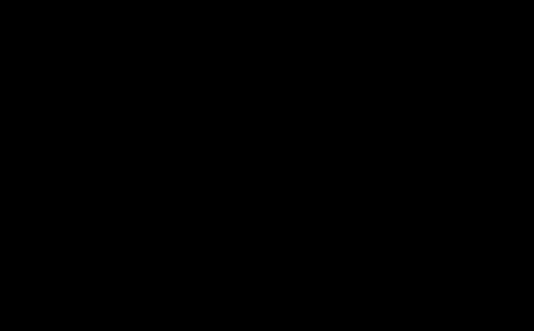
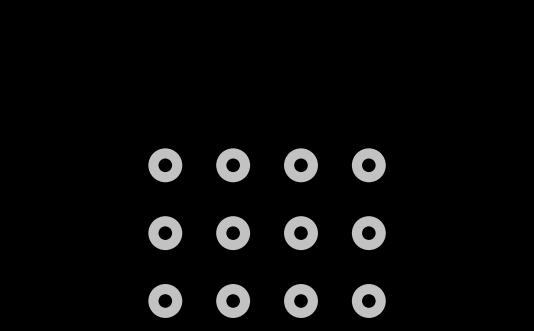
via: none -> (165, 165)
via: none -> (233, 165)
via: none -> (300, 165)
via: none -> (368, 165)
via: none -> (165, 233)
via: none -> (233, 233)
via: none -> (300, 233)
via: none -> (368, 233)
via: none -> (165, 300)
via: none -> (233, 300)
via: none -> (300, 300)
via: none -> (368, 300)

